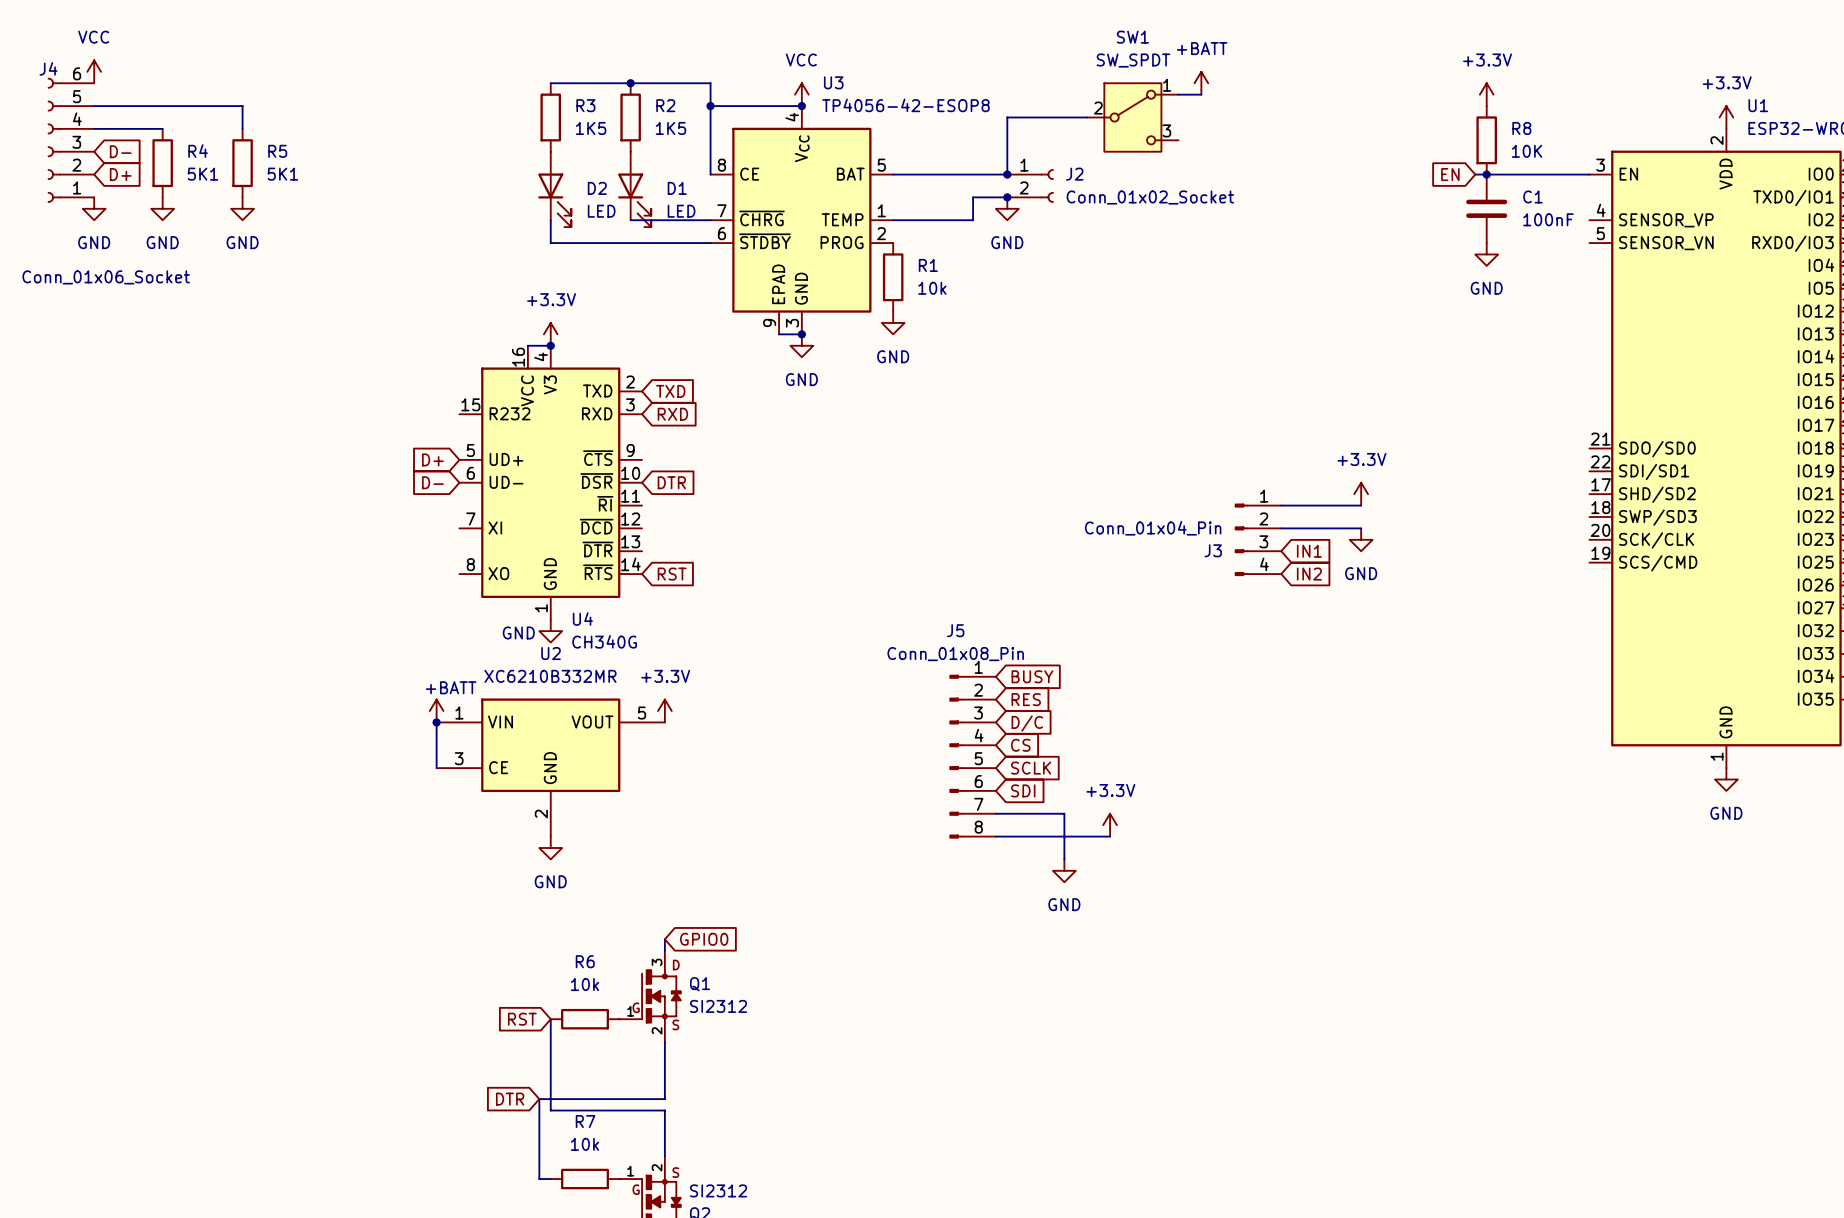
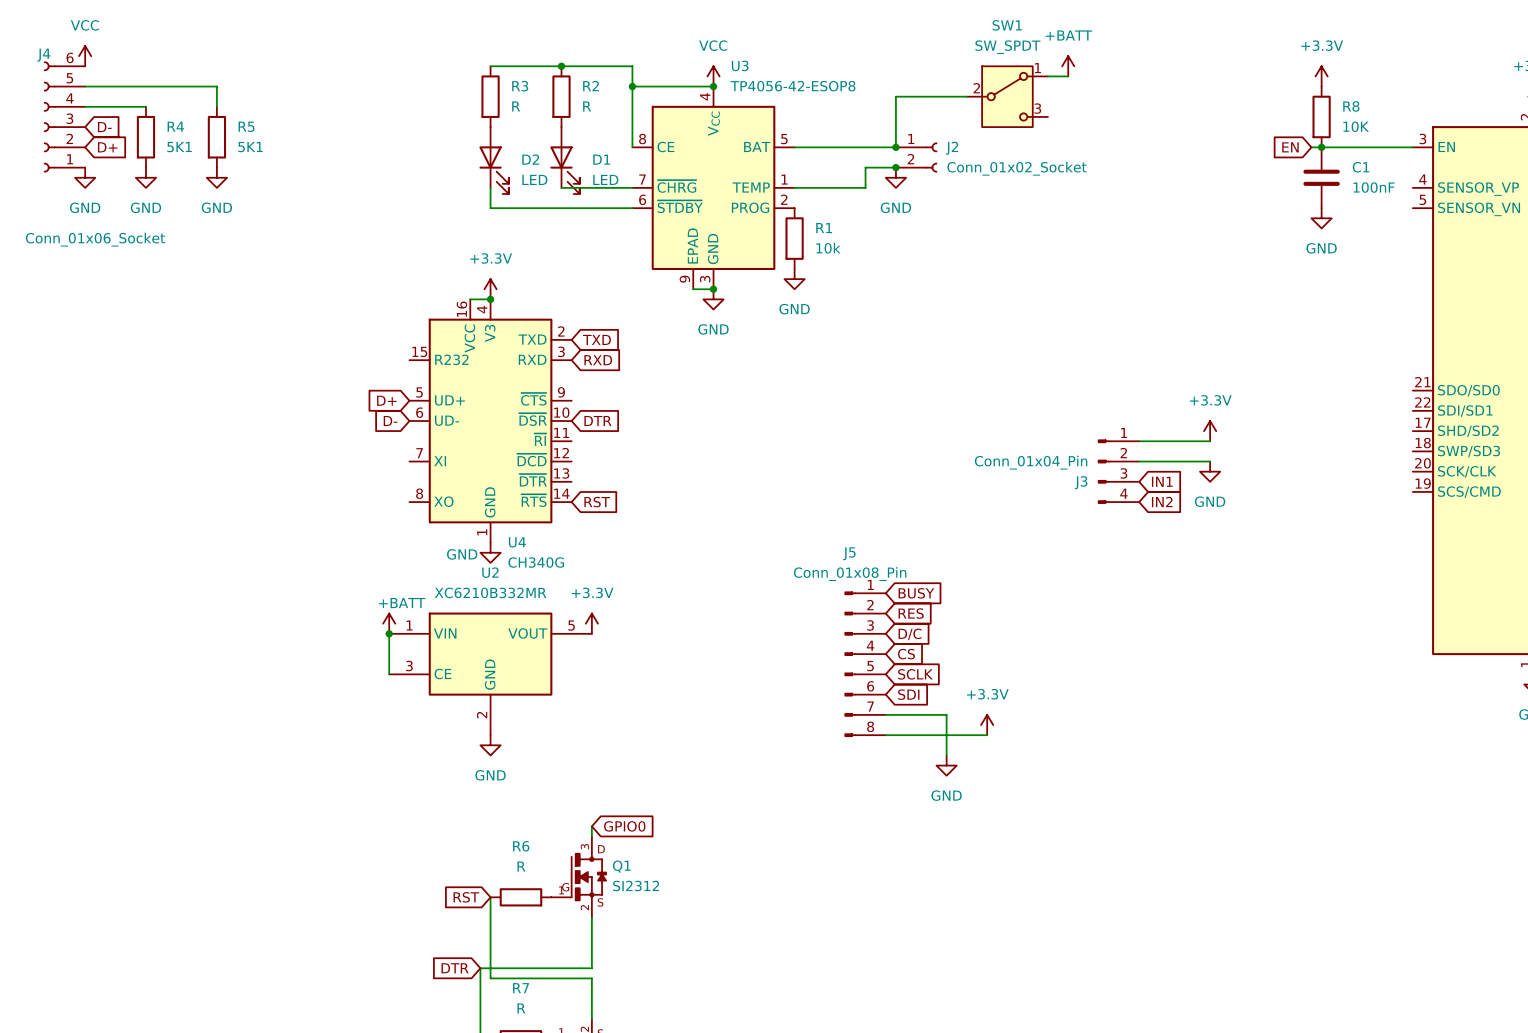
R3 value: 1K5 (591, 128) -> R (516, 106)
R2 value: 1K5 (670, 128) -> R (587, 106)
R6 value: 10k (585, 984) -> R (521, 866)
R7 value: 10k (585, 1144) -> R (521, 1008)

